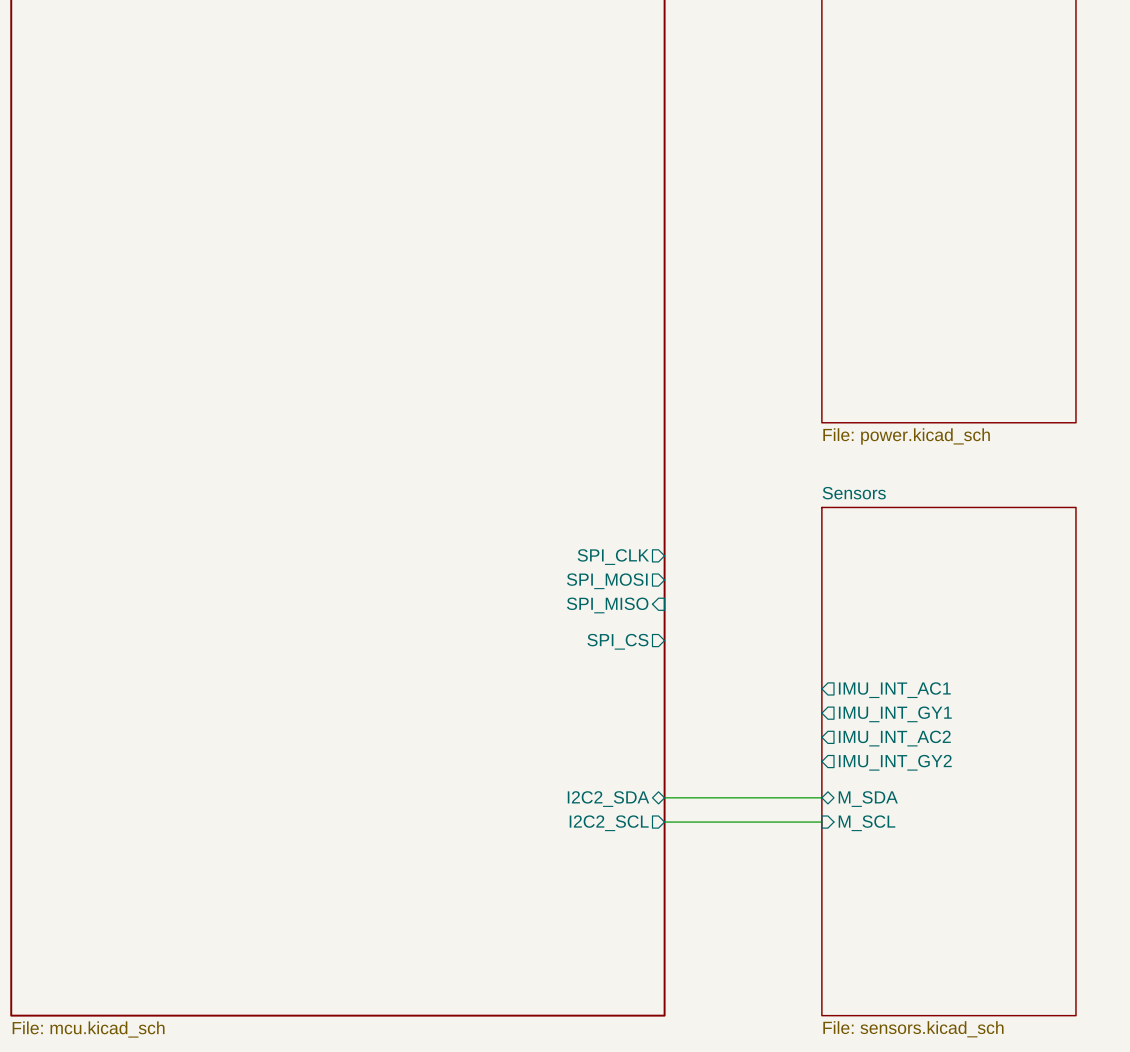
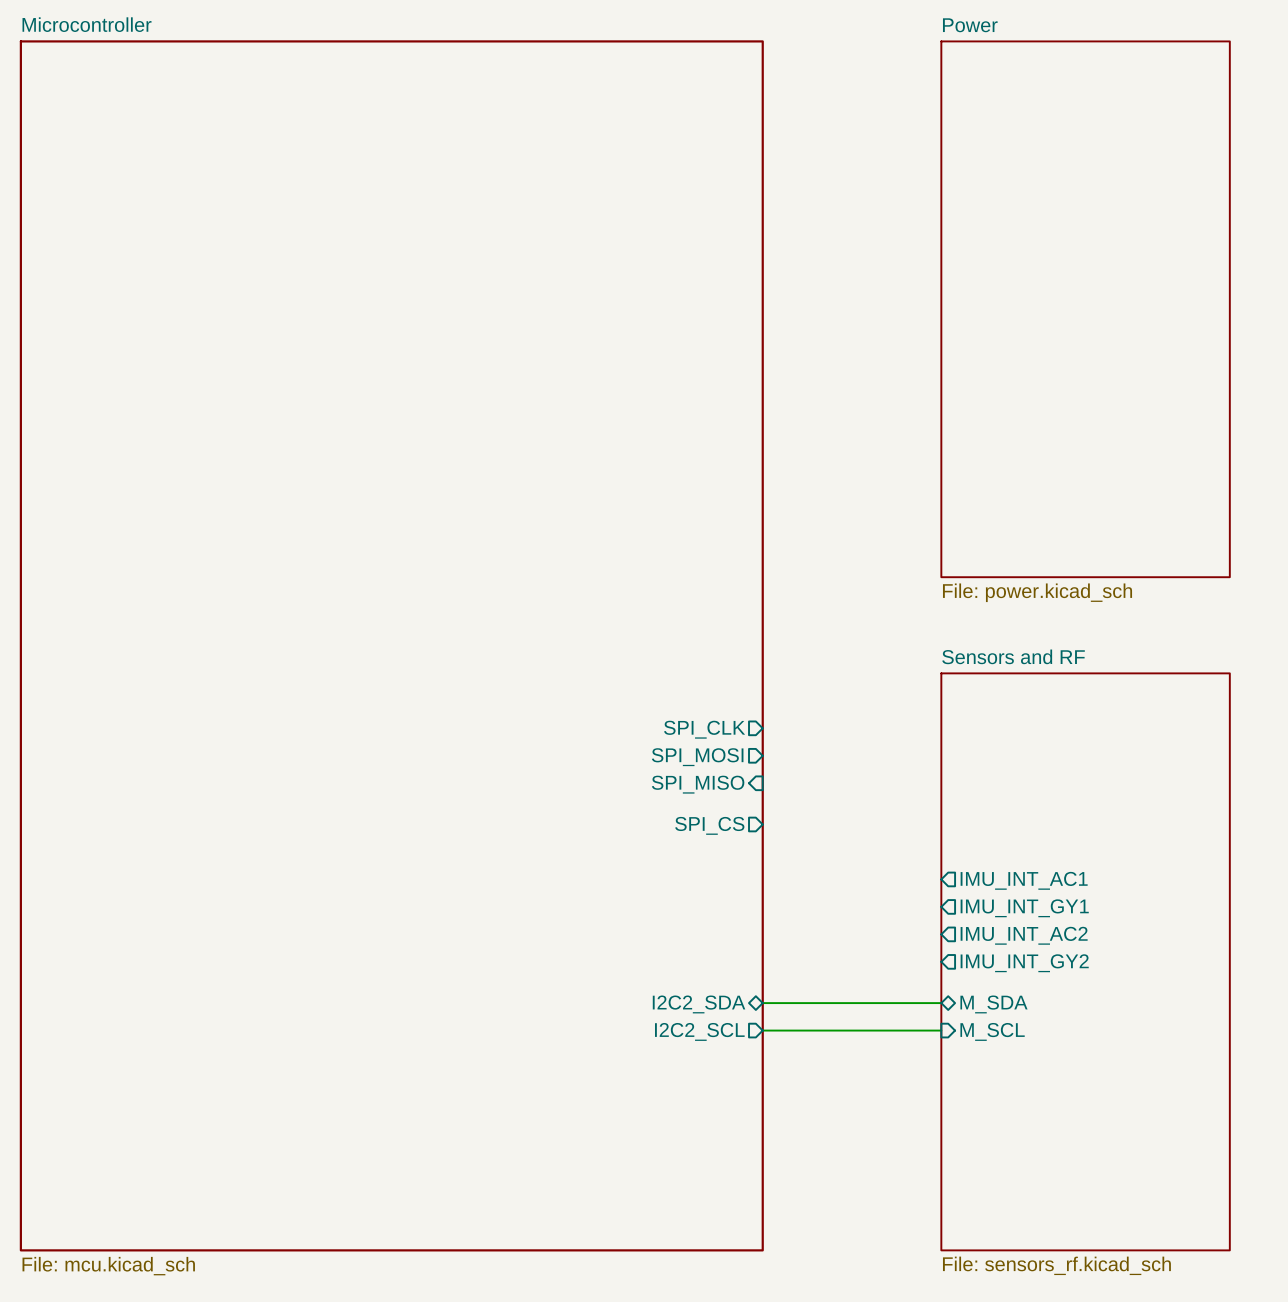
sheet Sensors name: Sensors (854, 493) -> Sensors and RF (1013, 656)
sheet Sensors value: File: sensors.kicad_sch (913, 1029) -> File: sensors_rf.kicad_sch (1056, 1265)

